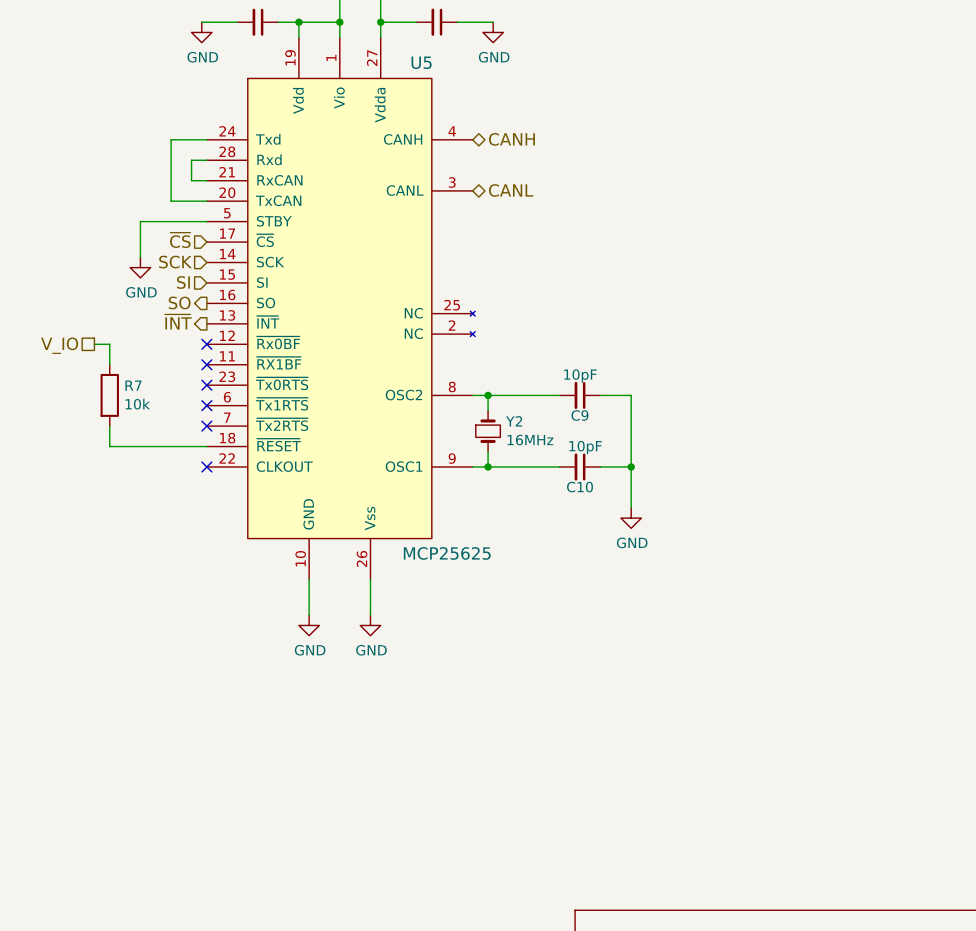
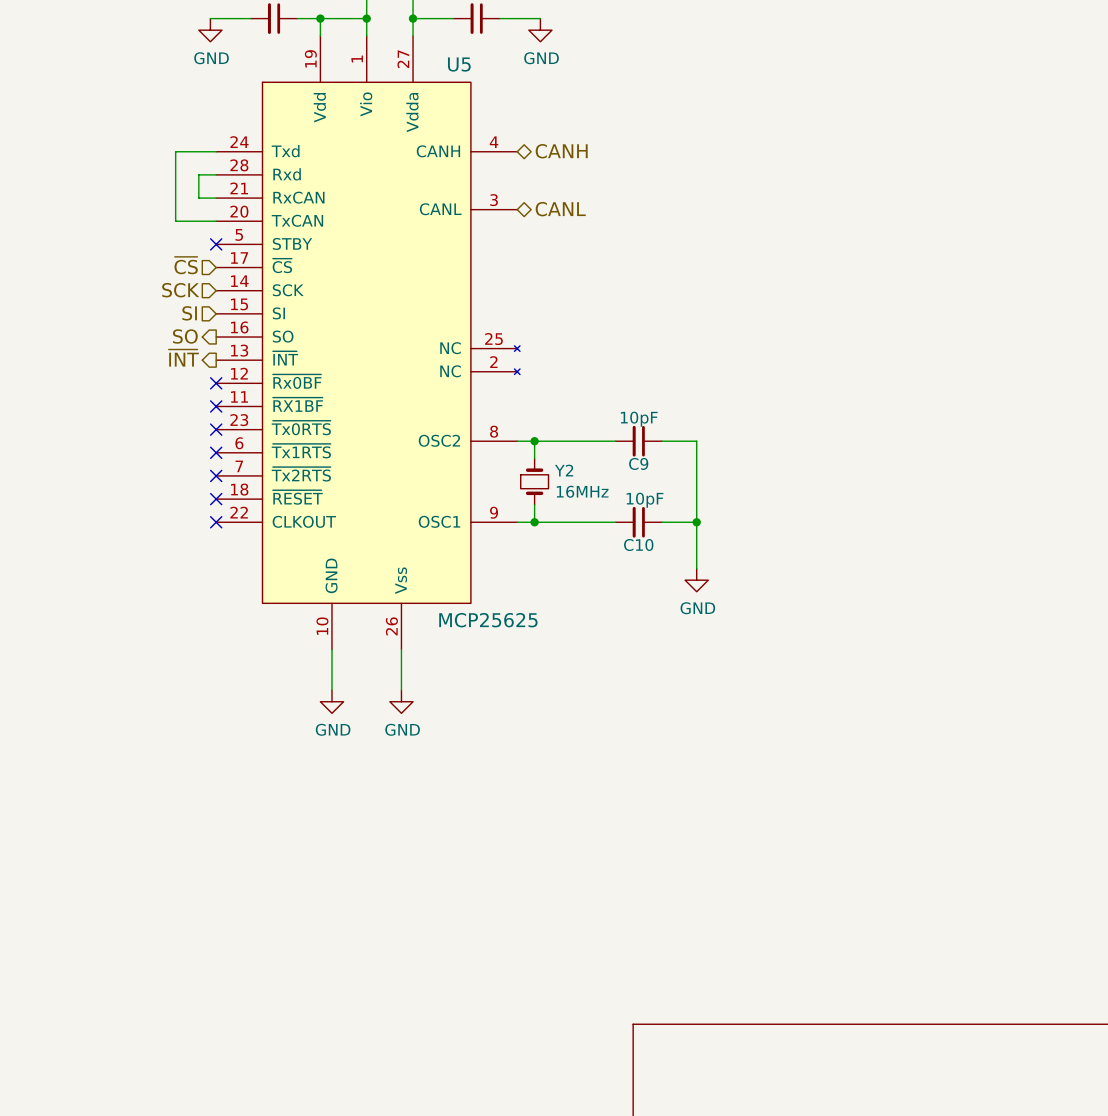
wire: (206, 221) (140, 221) (140, 257) -> none
no-connect mark: none -> (216, 244)
power symbol: GND (140, 267) -> none
wire: (94, 344) (109, 344) (109, 364) -> none
hierarchical label: V_IO (59, 345) -> none
R7: 10k (109, 395) -> none
wire: (109, 426) (109, 446) (206, 446) -> none
no-connect mark: none -> (216, 499)

